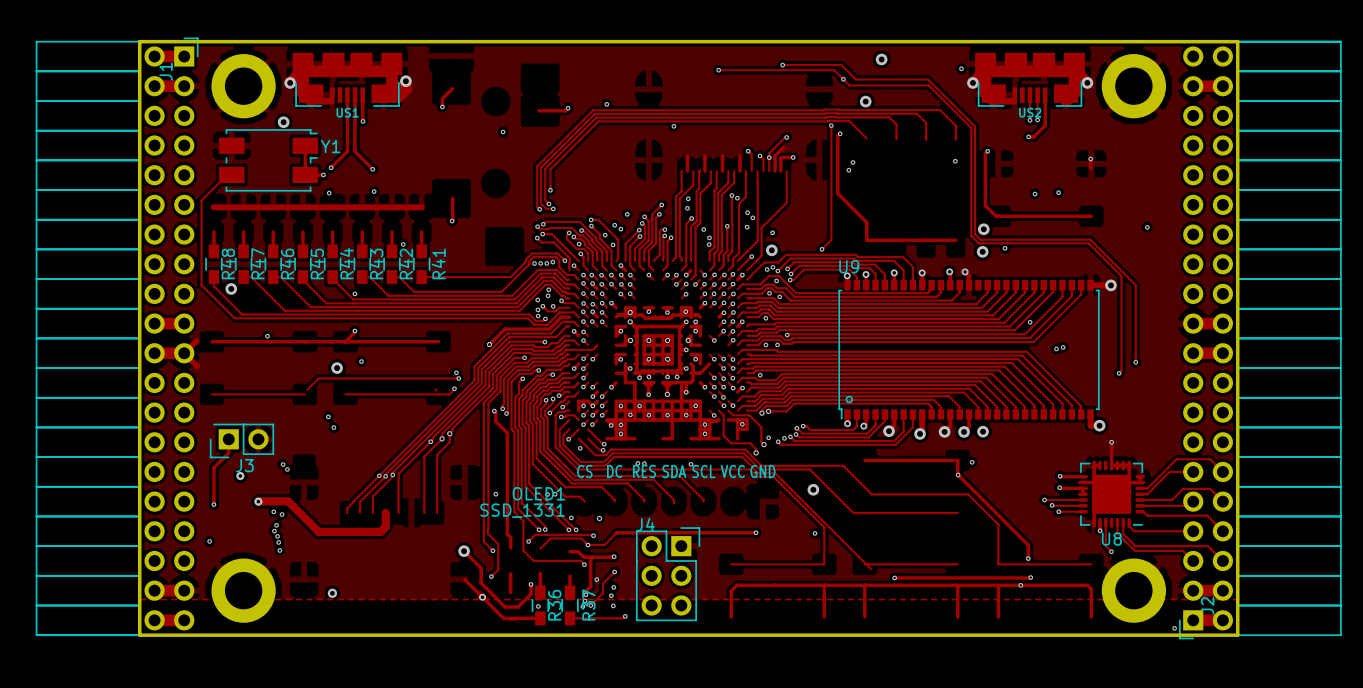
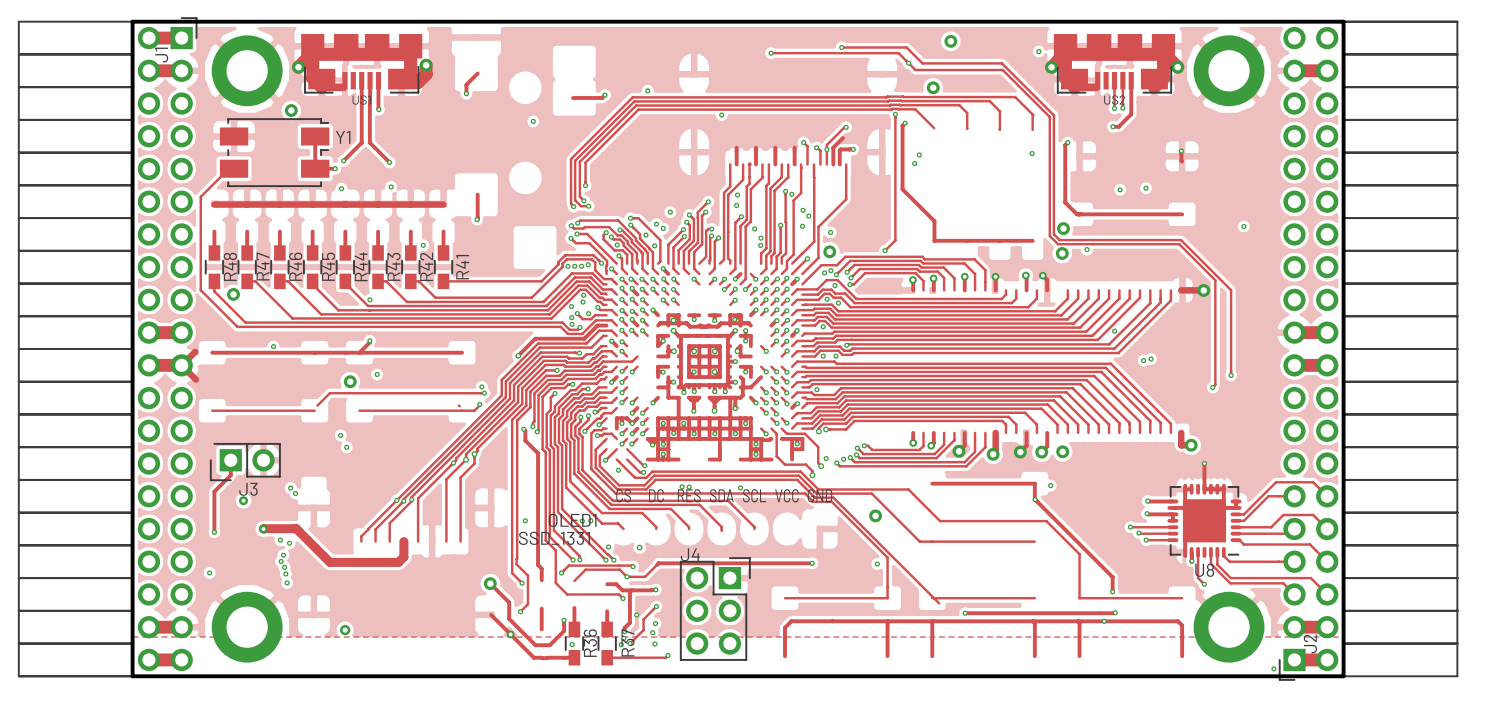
U9: (969, 349) -> none

